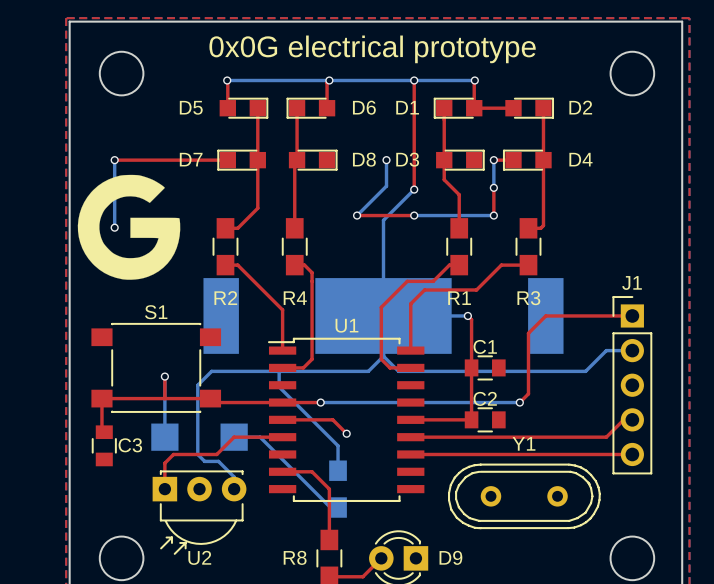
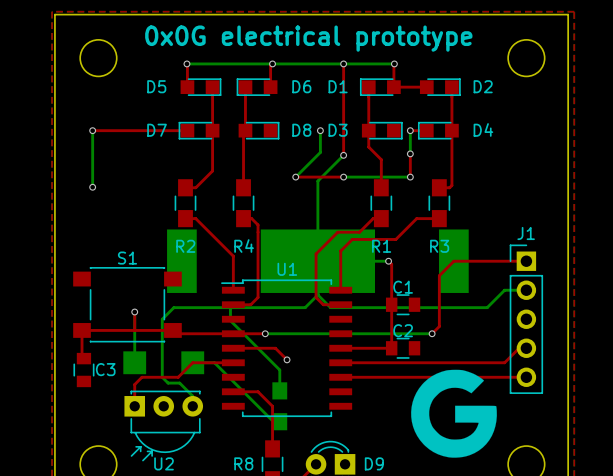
drawing: [77, 174, 181, 280] -> none
drawing: none -> [411, 369, 497, 458]
Y1: (524, 496) -> none

